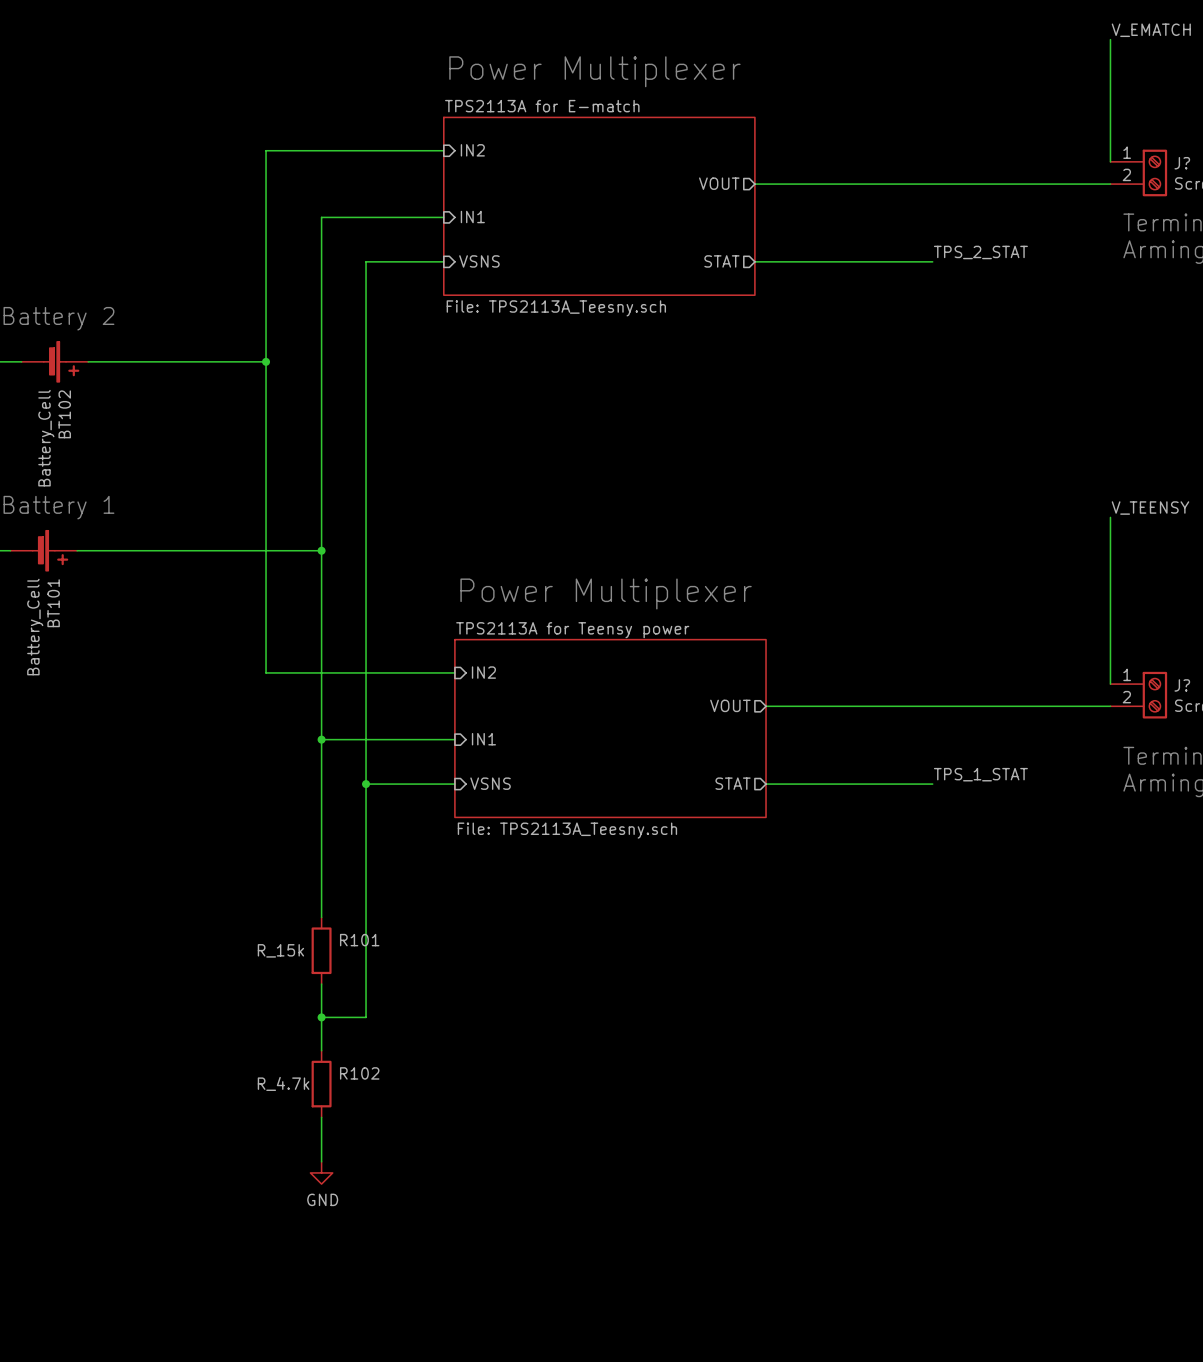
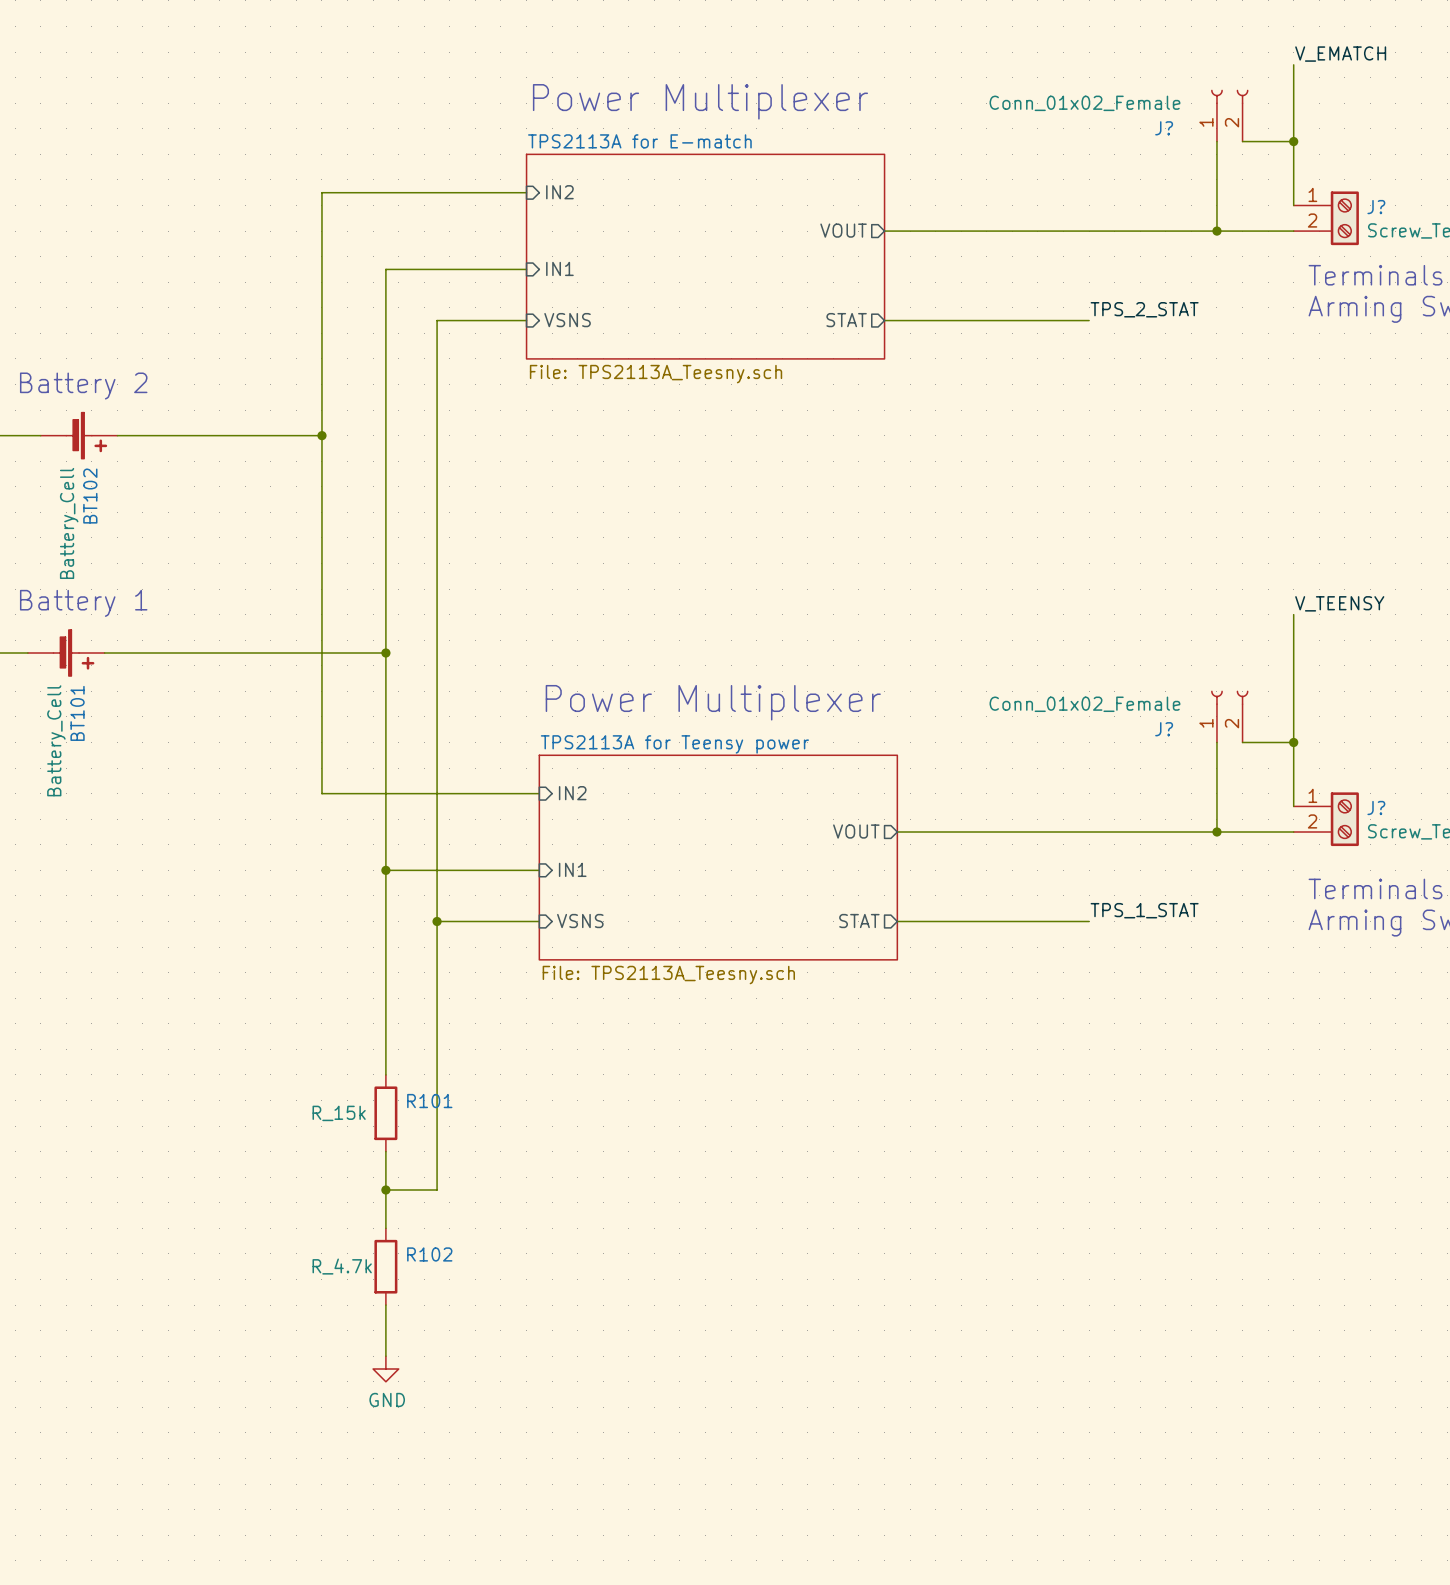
J?: none -> Conn_01x02_Female (1229, 115)
wire: none -> (1216, 141) (1216, 231)
wire: none -> (1242, 141) (1293, 141)
junction: none -> (1293, 141)
junction: none -> (1216, 231)
J?: none -> Conn_01x02_Female (1229, 716)
wire: none -> (1216, 742) (1216, 832)
wire: none -> (1242, 742) (1293, 742)
junction: none -> (1293, 742)
junction: none -> (1216, 832)

